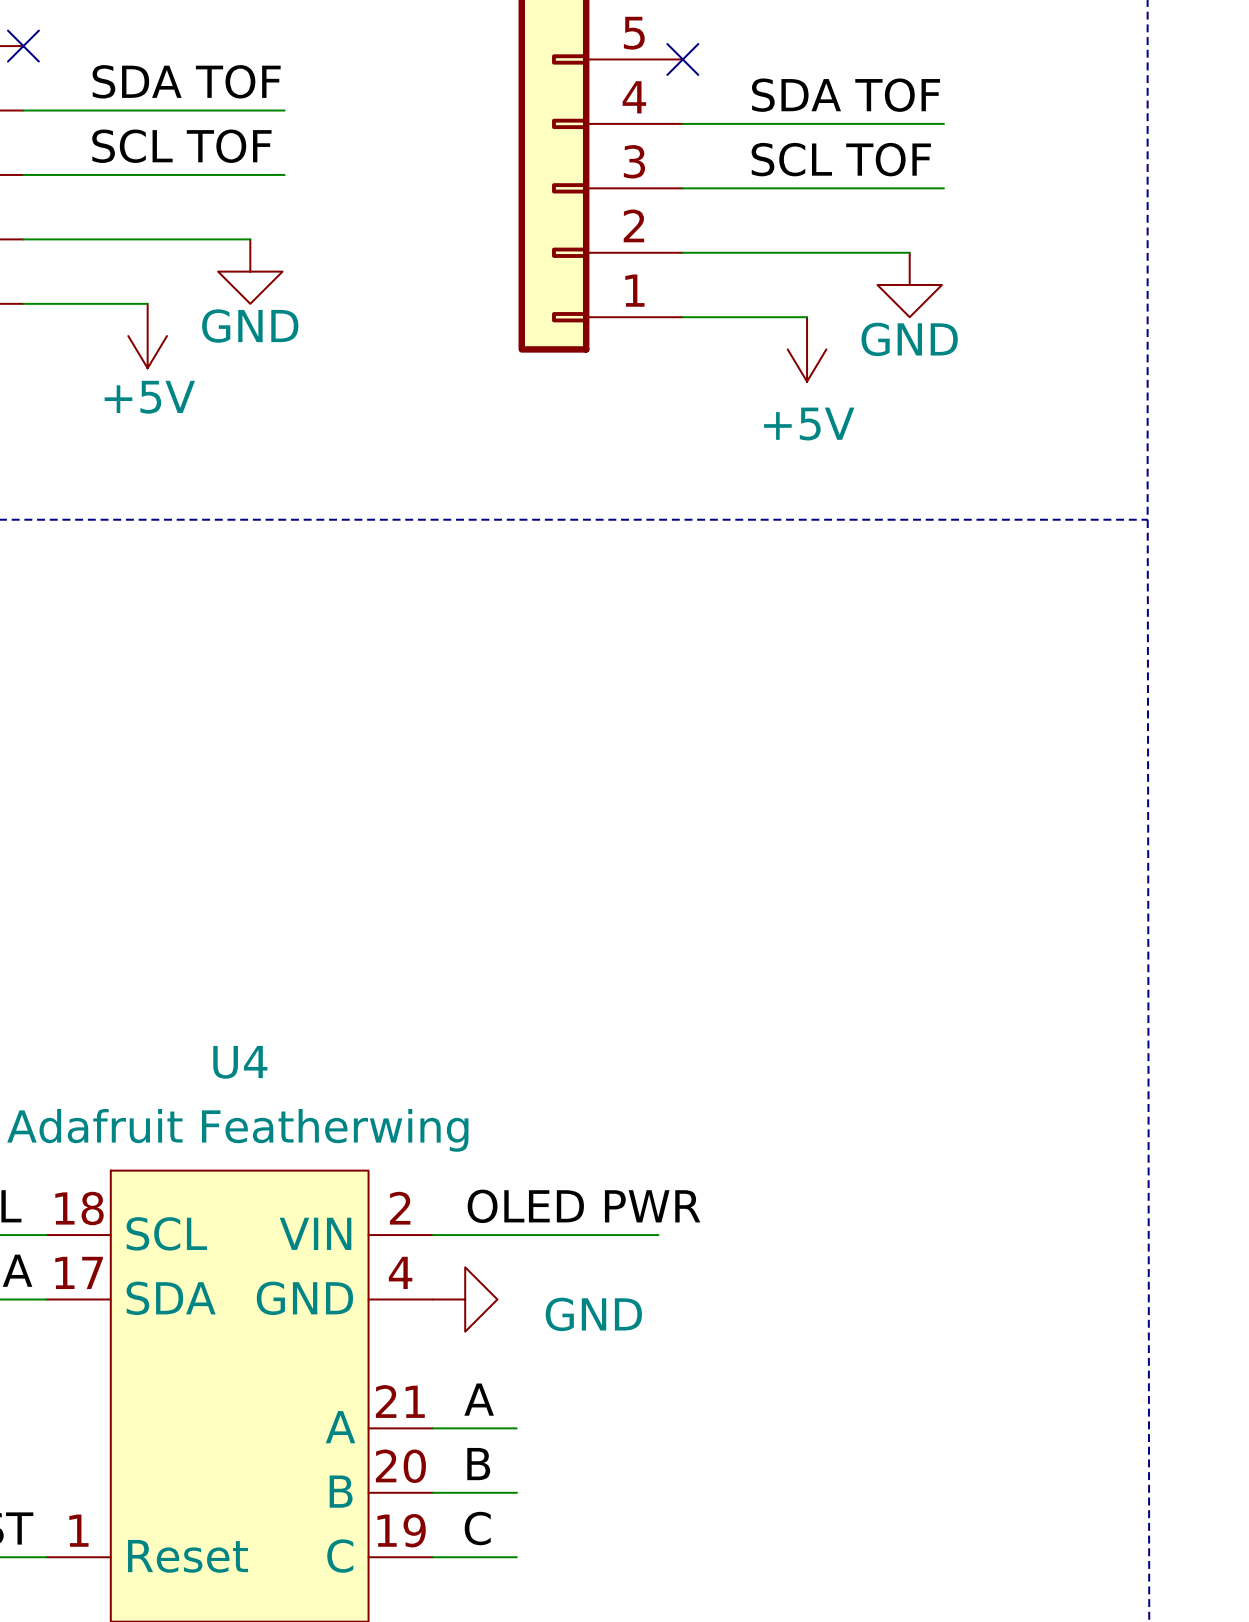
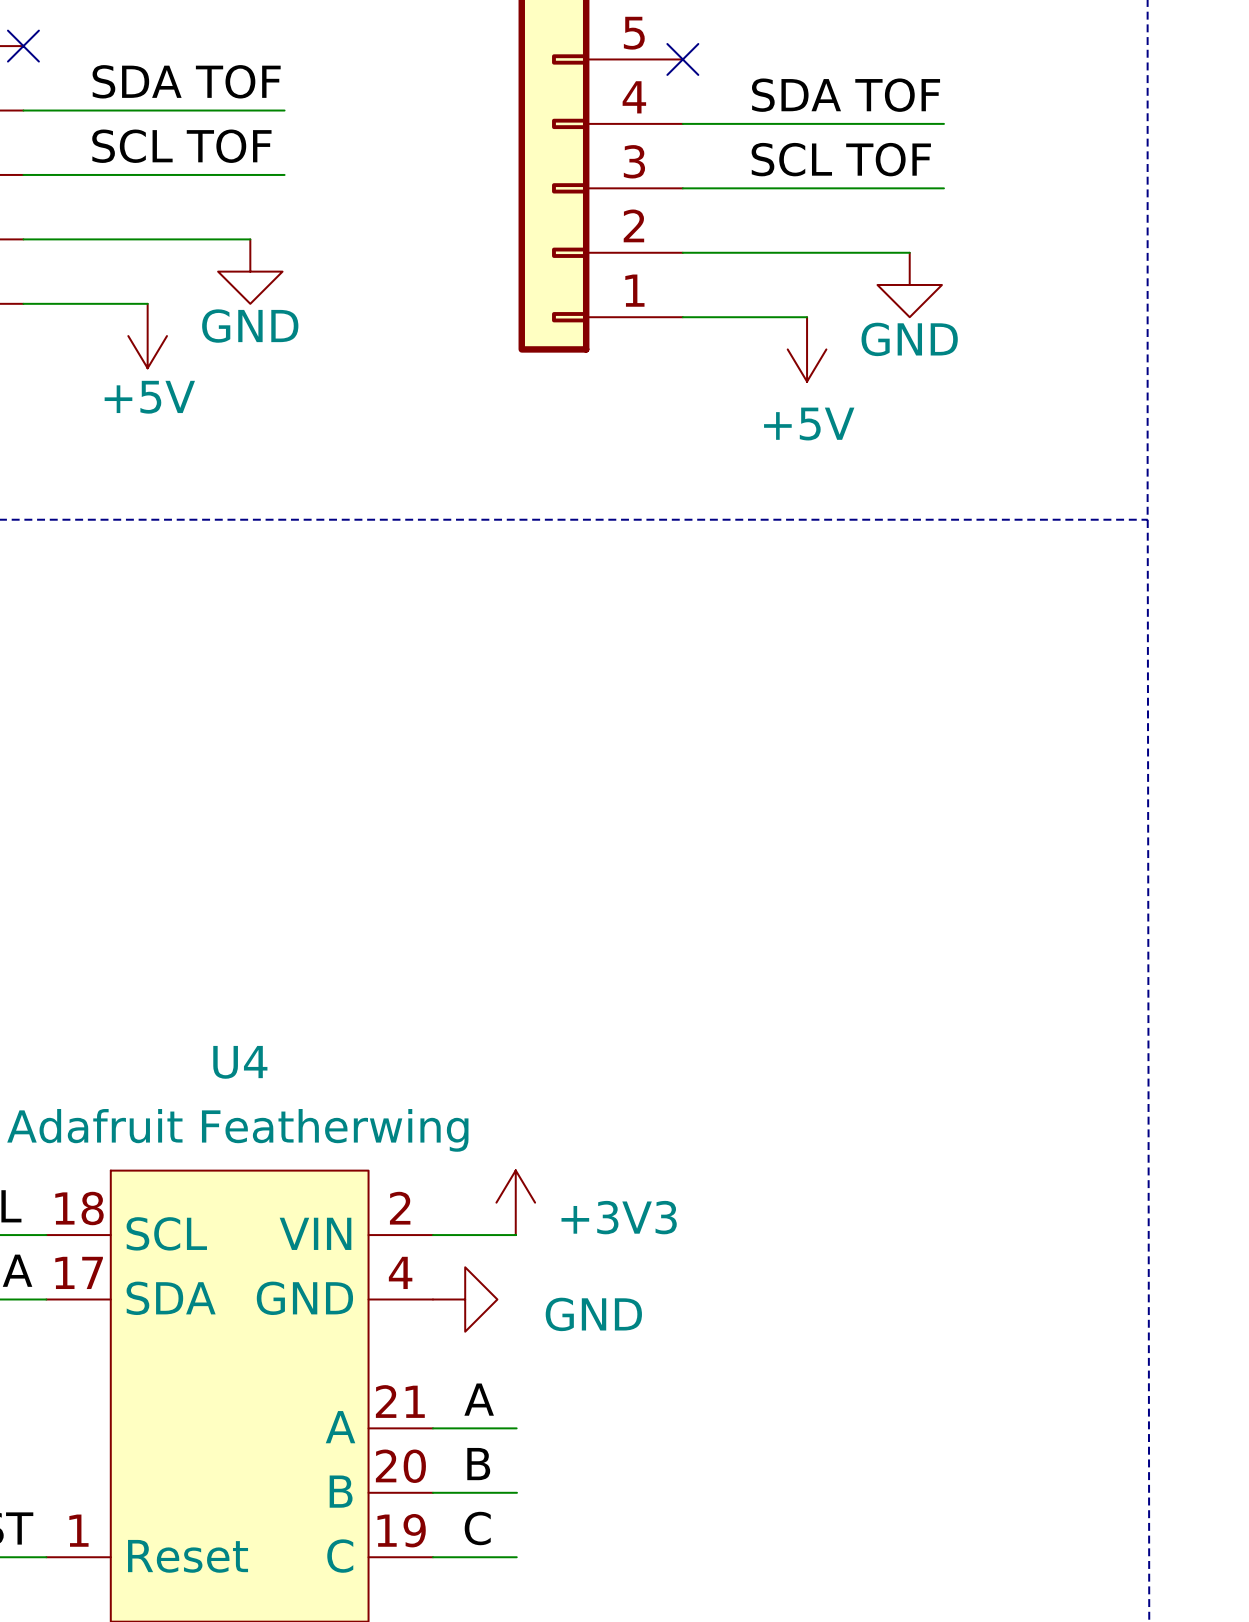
power symbol: none -> +3V3 (515, 1202)
label: OLED PWR (584, 1206) -> none
wire: (515, 1235) (658, 1235) -> none

